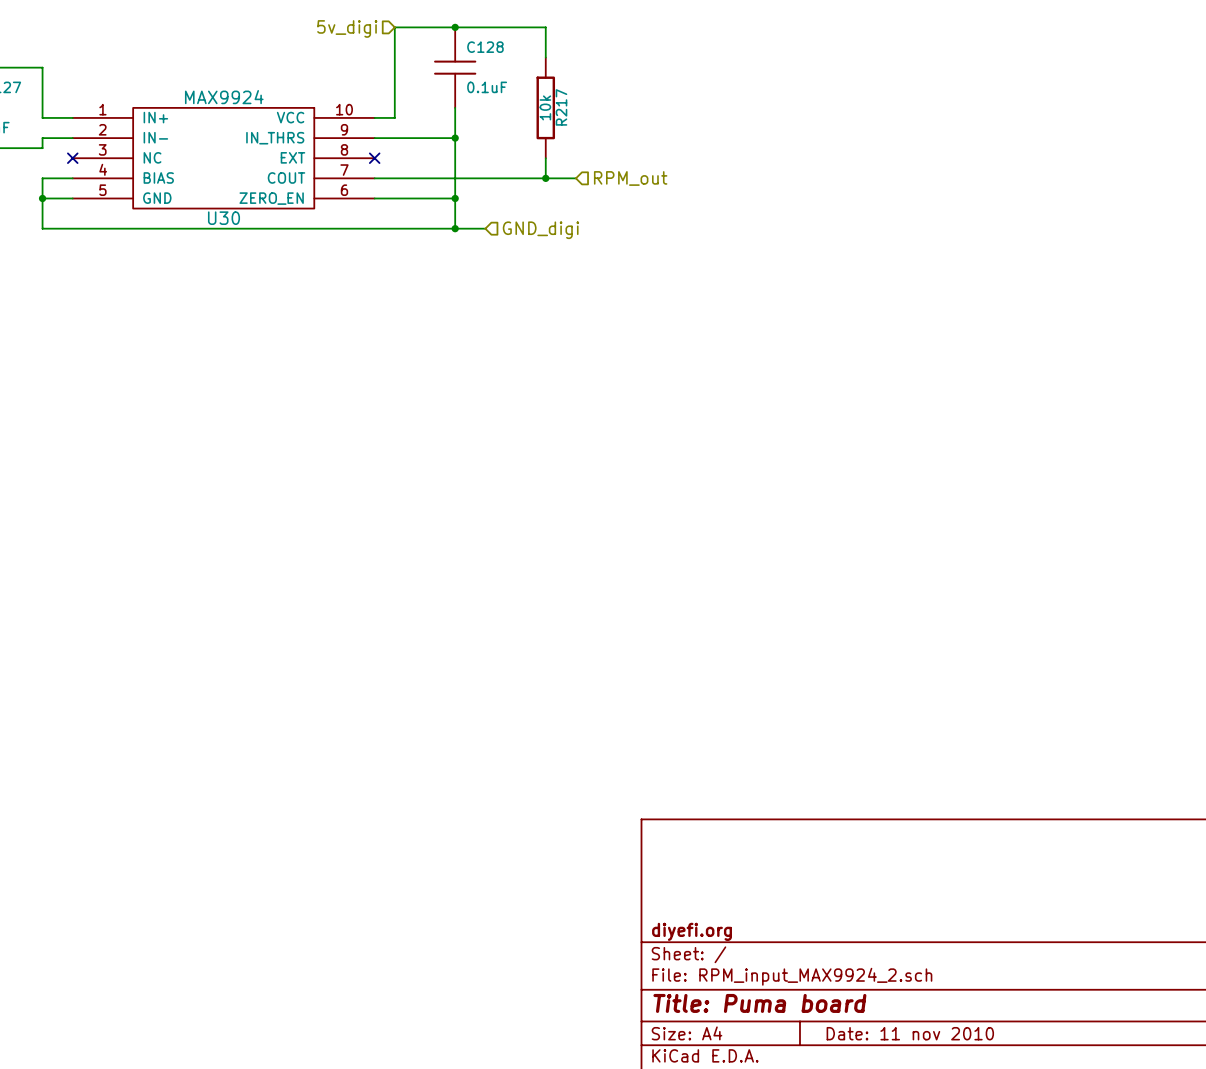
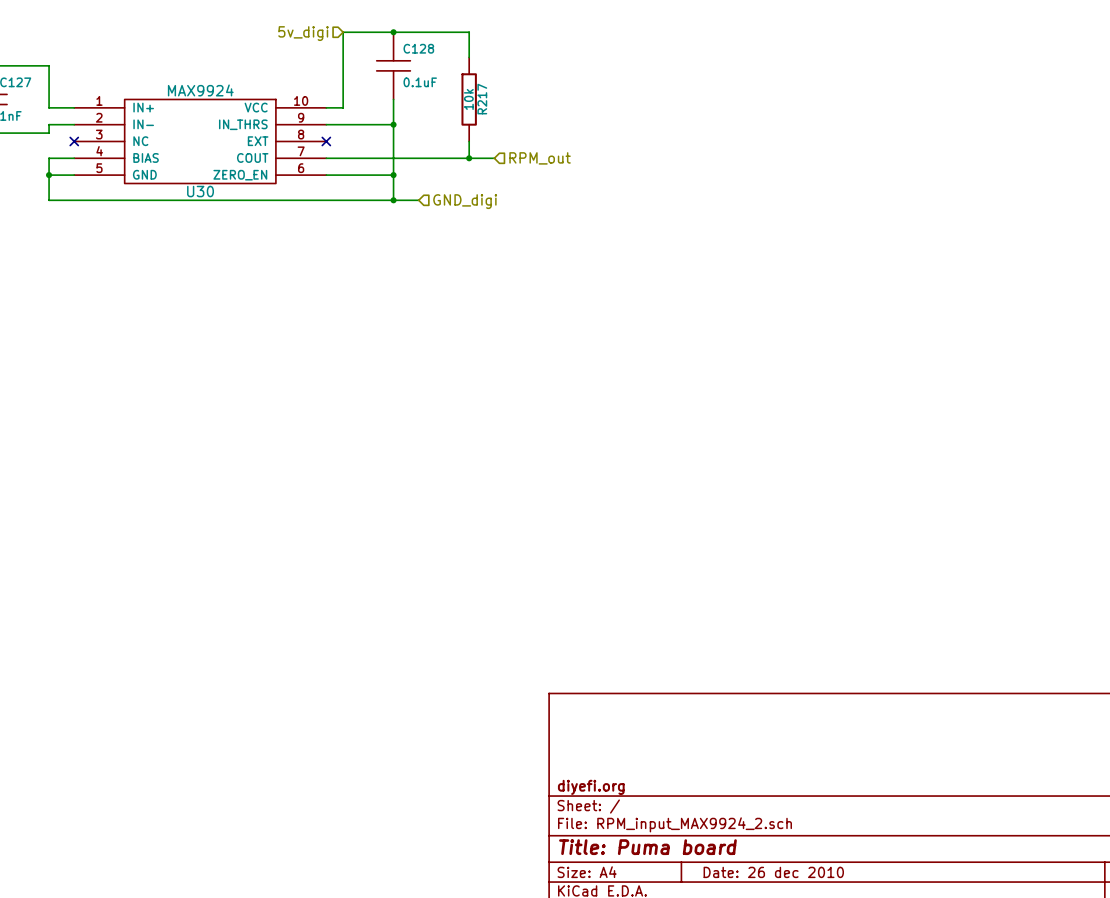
title block: Date: 11 nov 2010 (910, 1033) -> Date: 26 dec 2010 (773, 872)

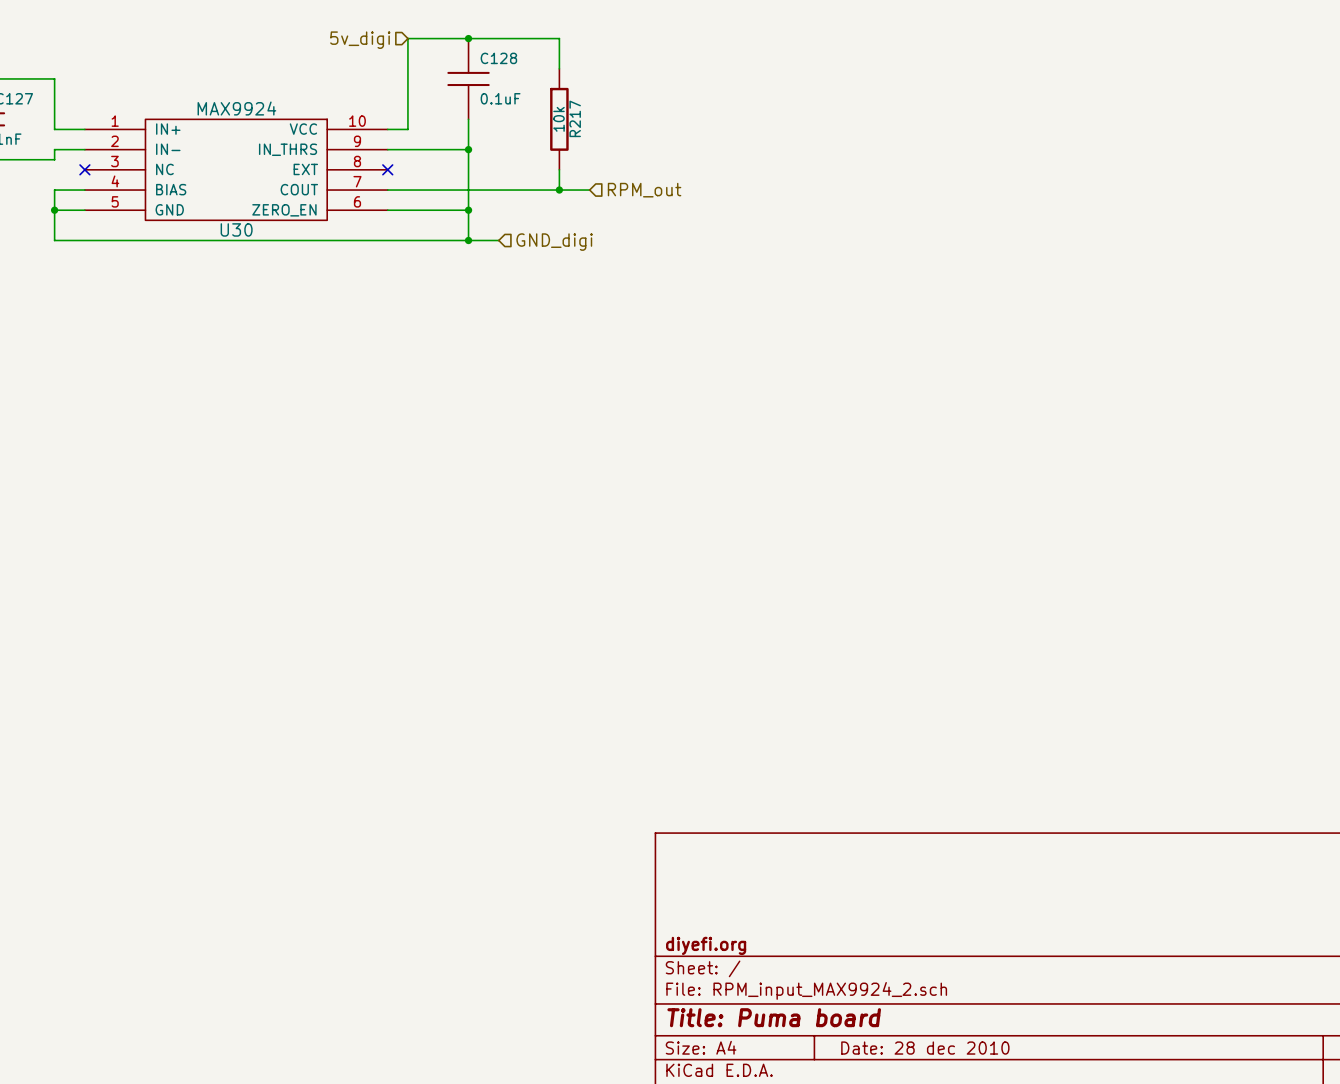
title block: Date: 26 dec 2010 (773, 872) -> Date: 28 dec 2010 (925, 1048)

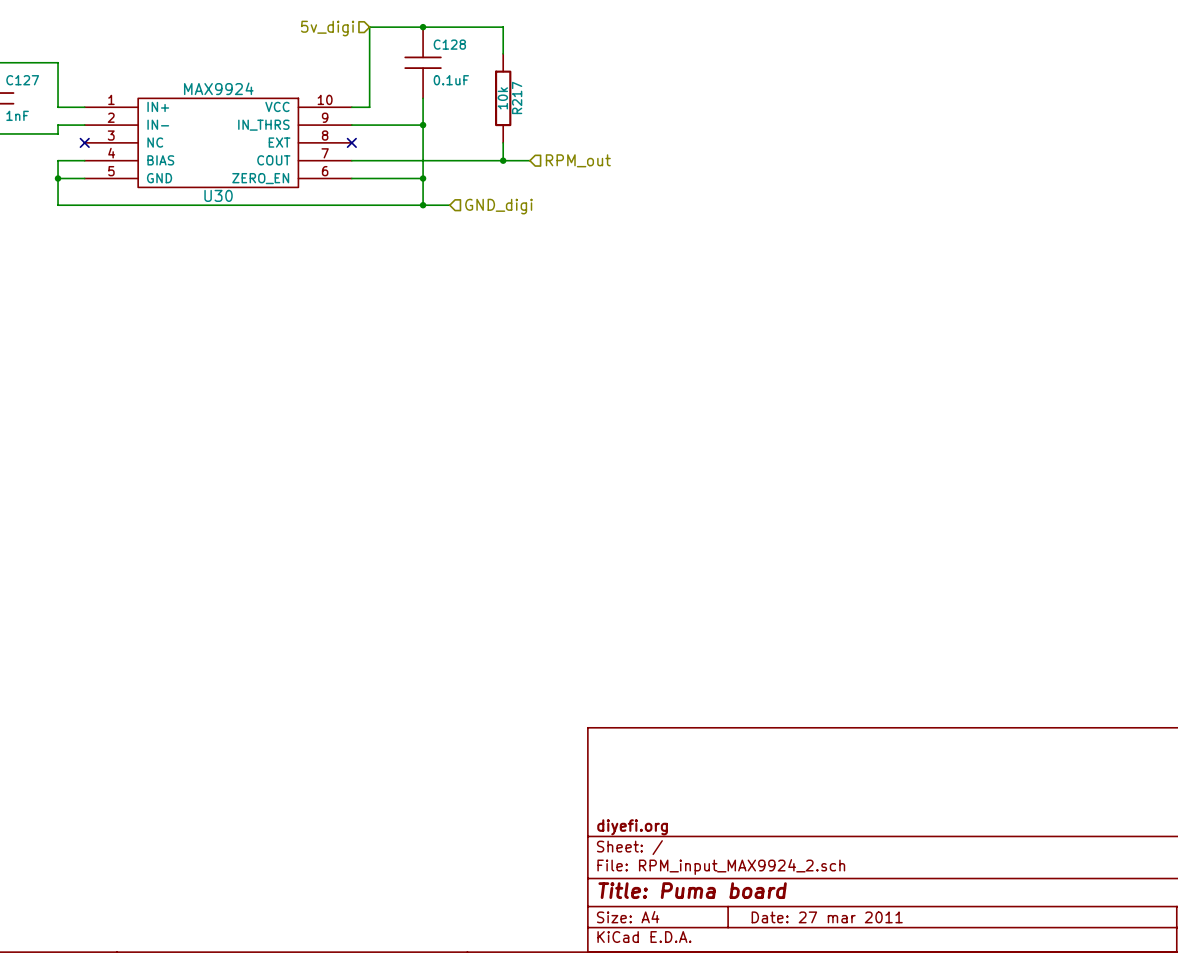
title block: Date: 28 dec 2010 (925, 1048) -> Date: 27 mar 2011 (827, 917)

